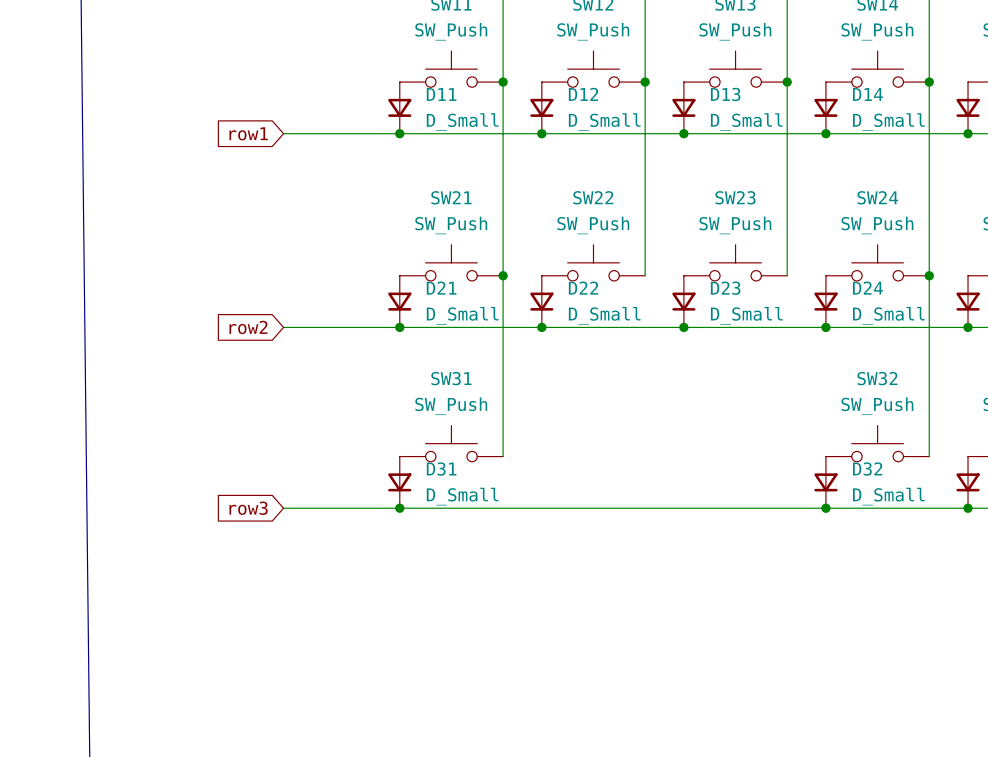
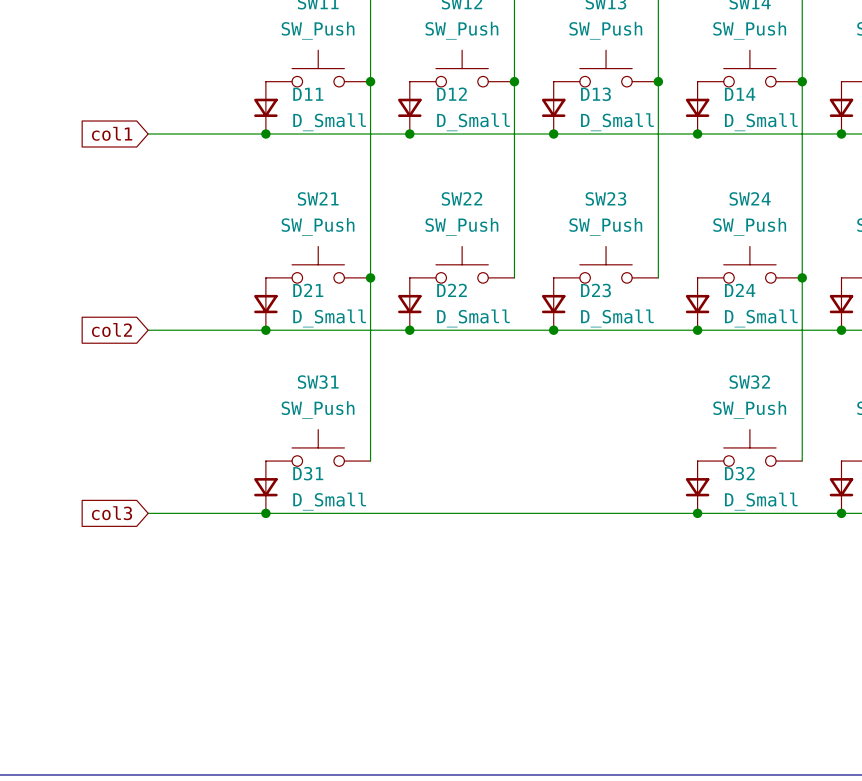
global label: row1 (248, 133) -> col1 (112, 133)
global label: row2 (248, 327) -> col2 (111, 330)
global label: row3 (248, 508) -> col3 (112, 513)

